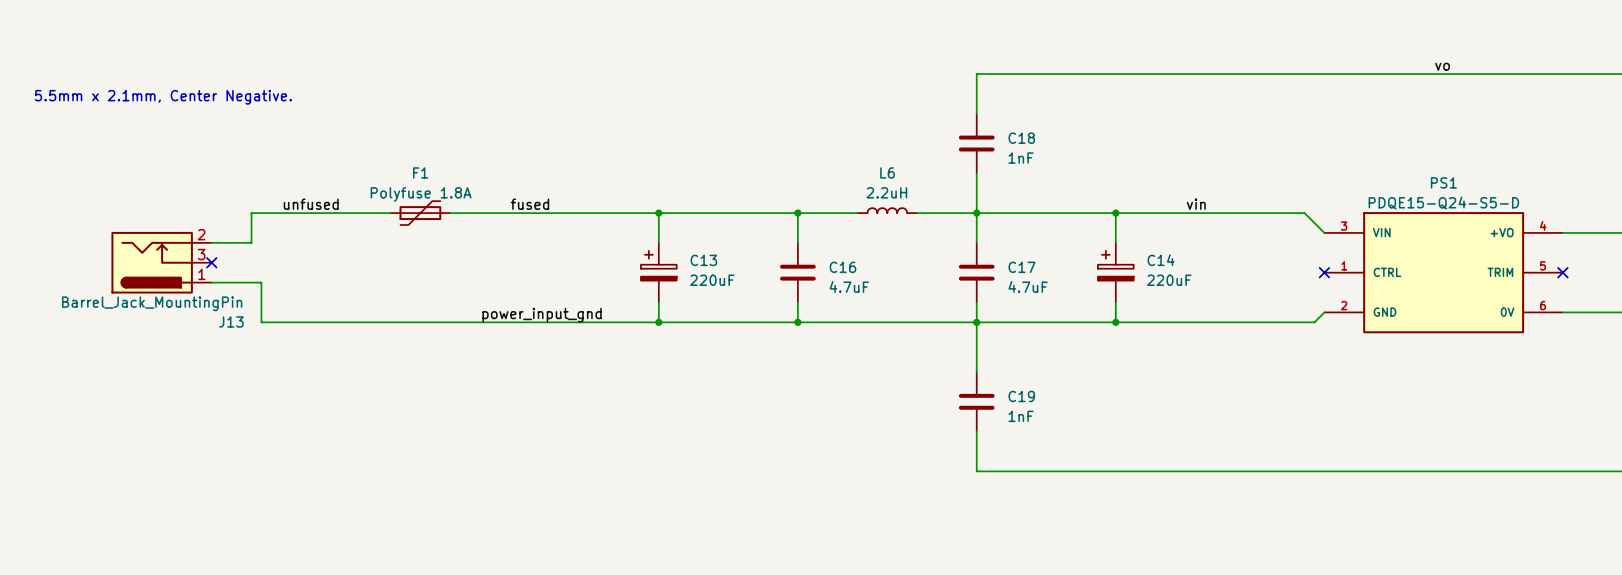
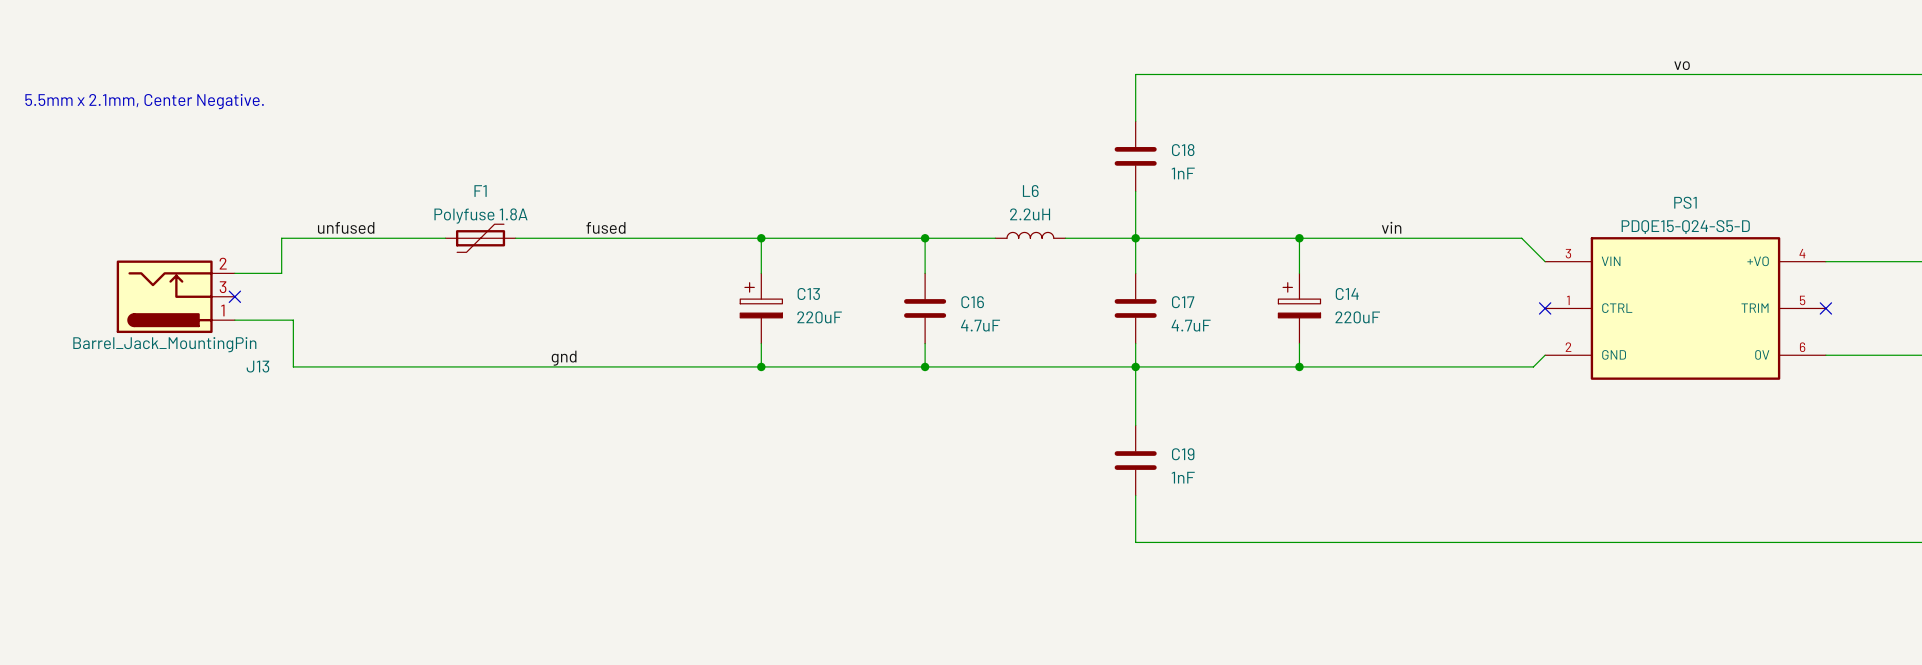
label: power_input_gnd (542, 315) -> gnd (564, 358)

